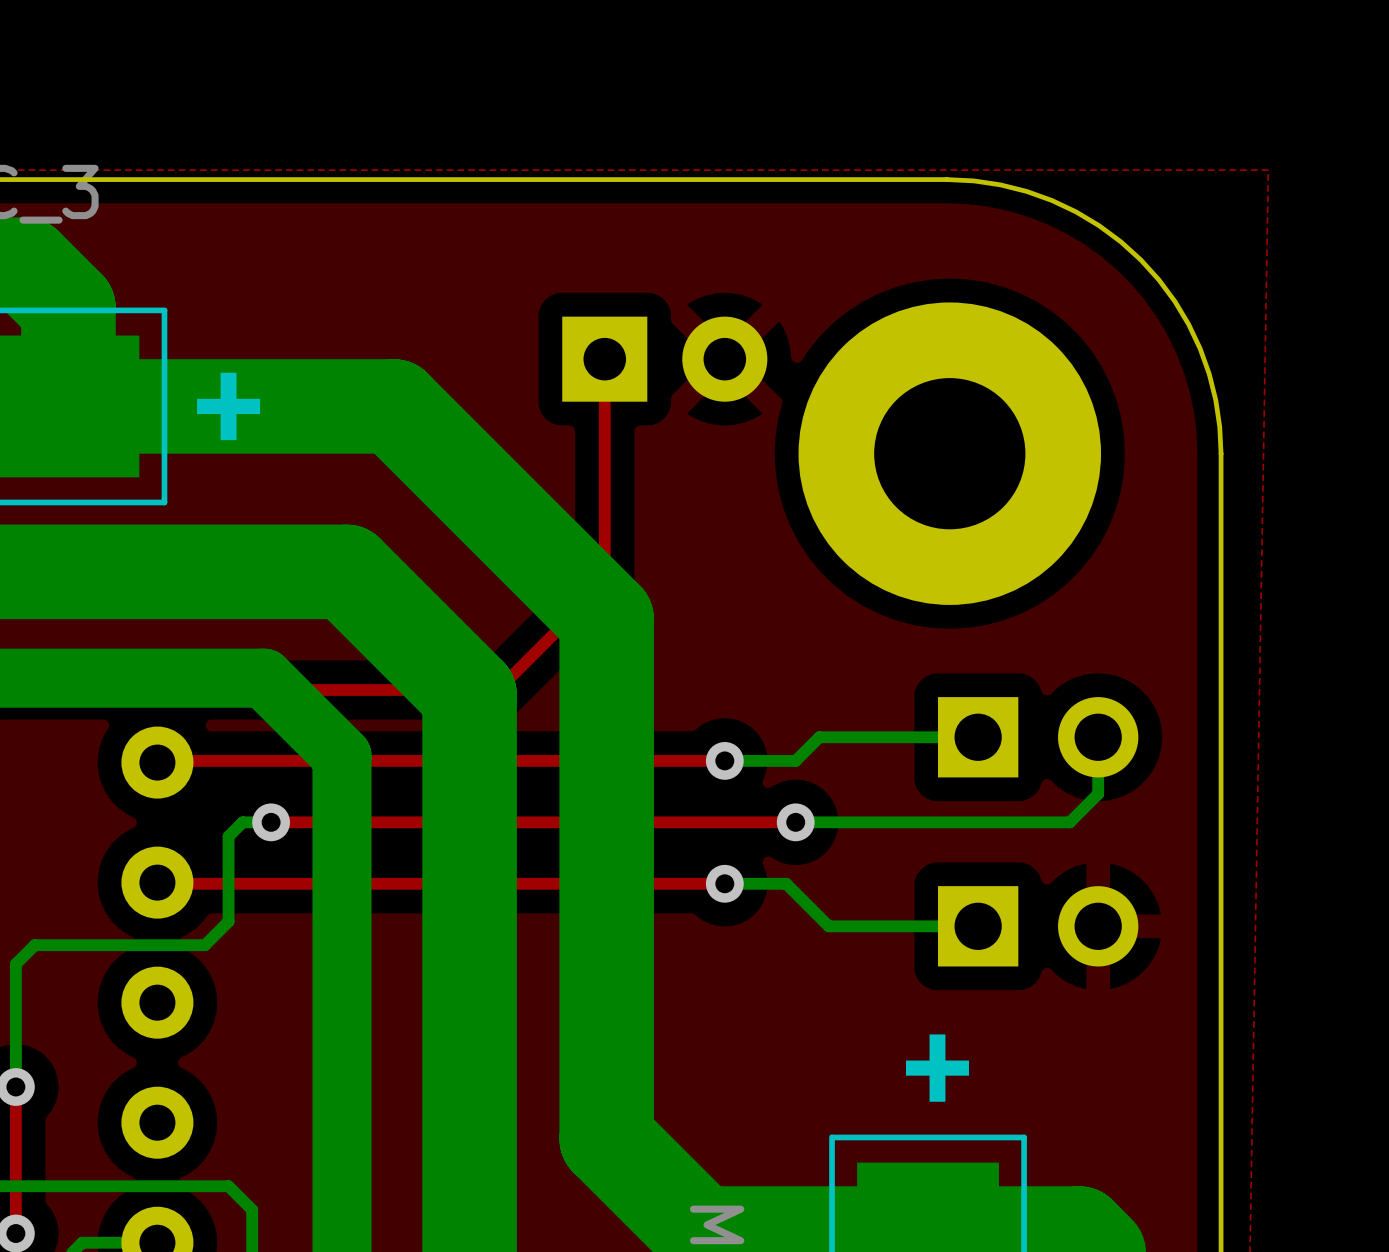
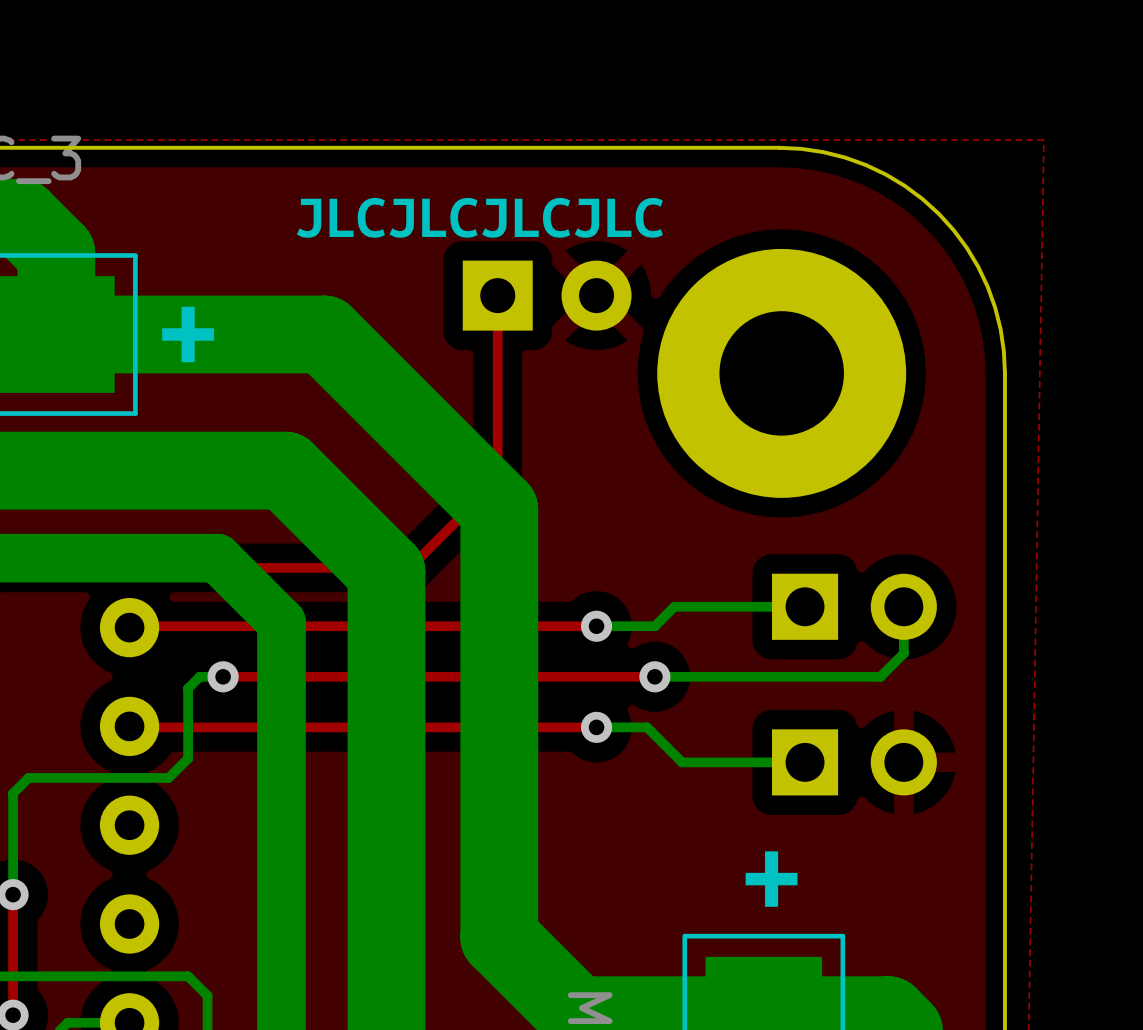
drawing: none -> [296, 197, 663, 238]

